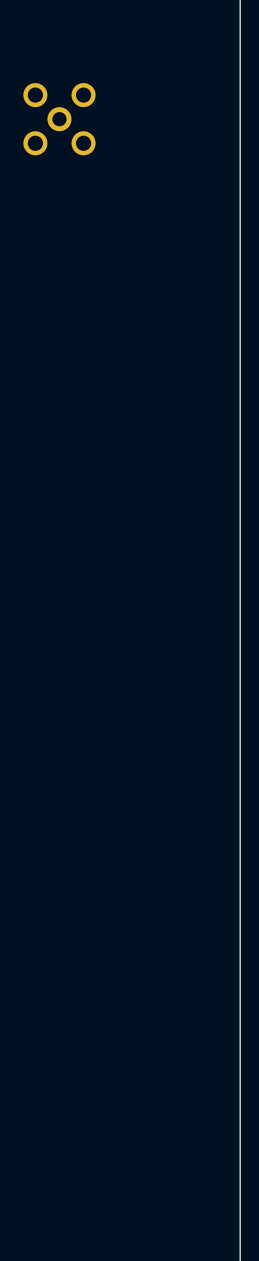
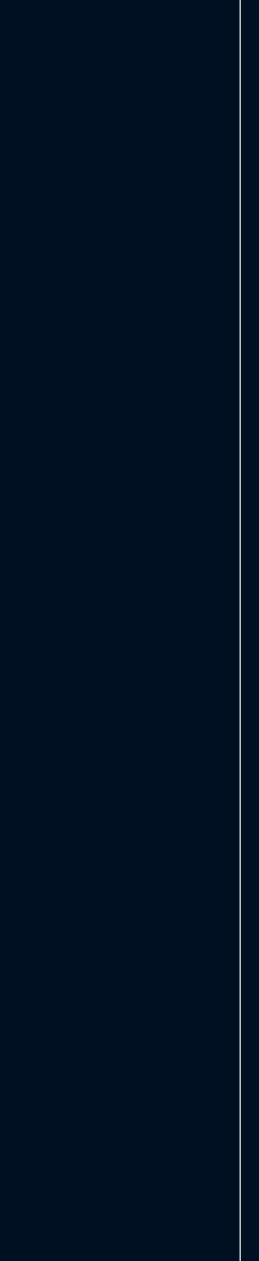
part: (59, 119) -> none

